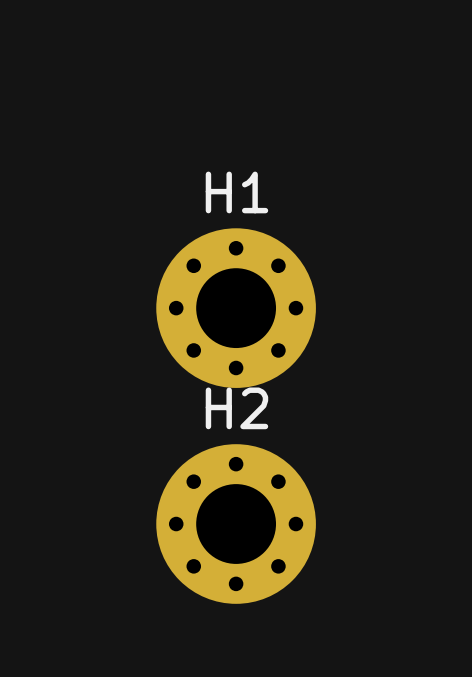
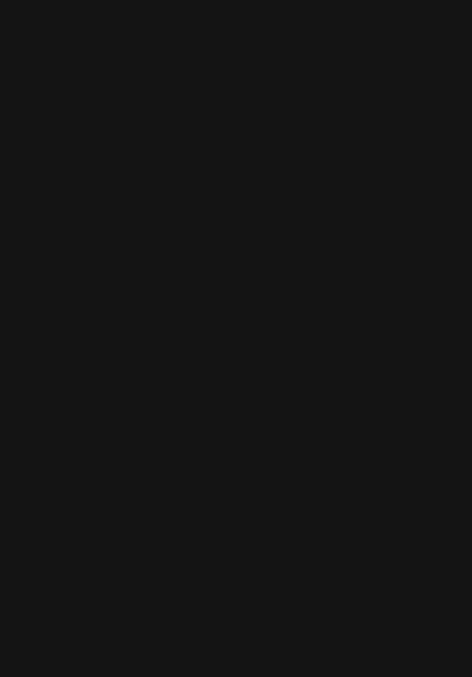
H1: (236, 308) -> none
H2: (236, 524) -> none

